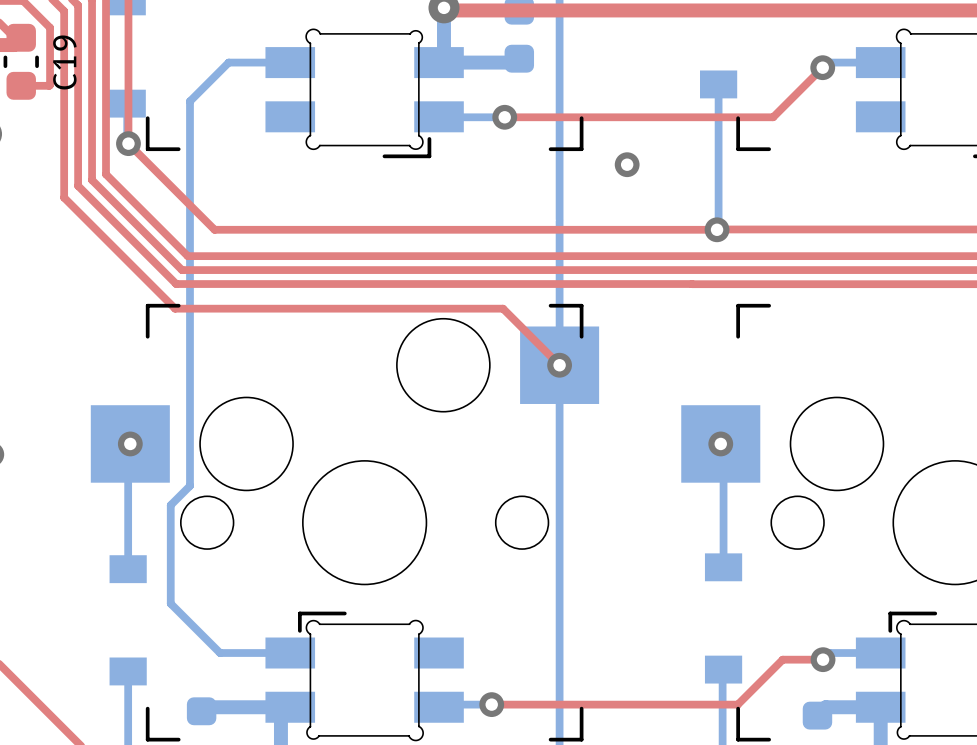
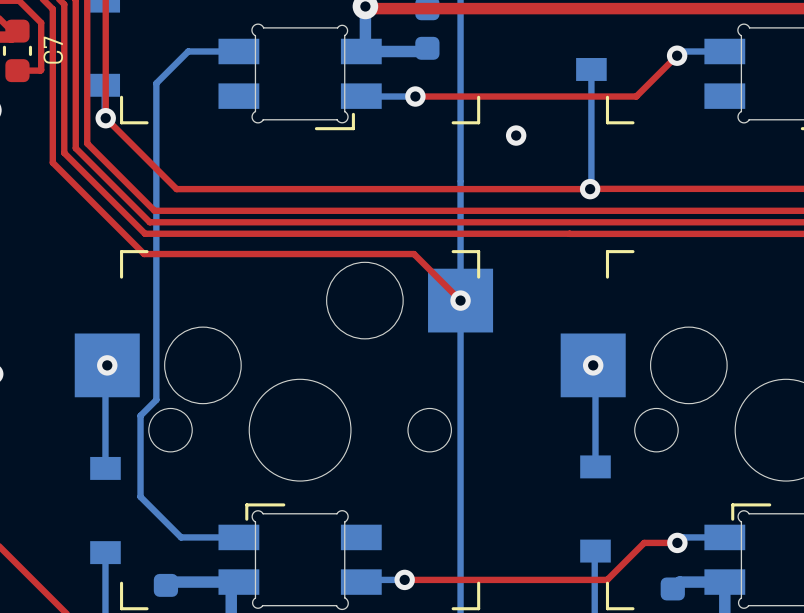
C19 name: C19 (64, 62) -> C7 (53, 50)

